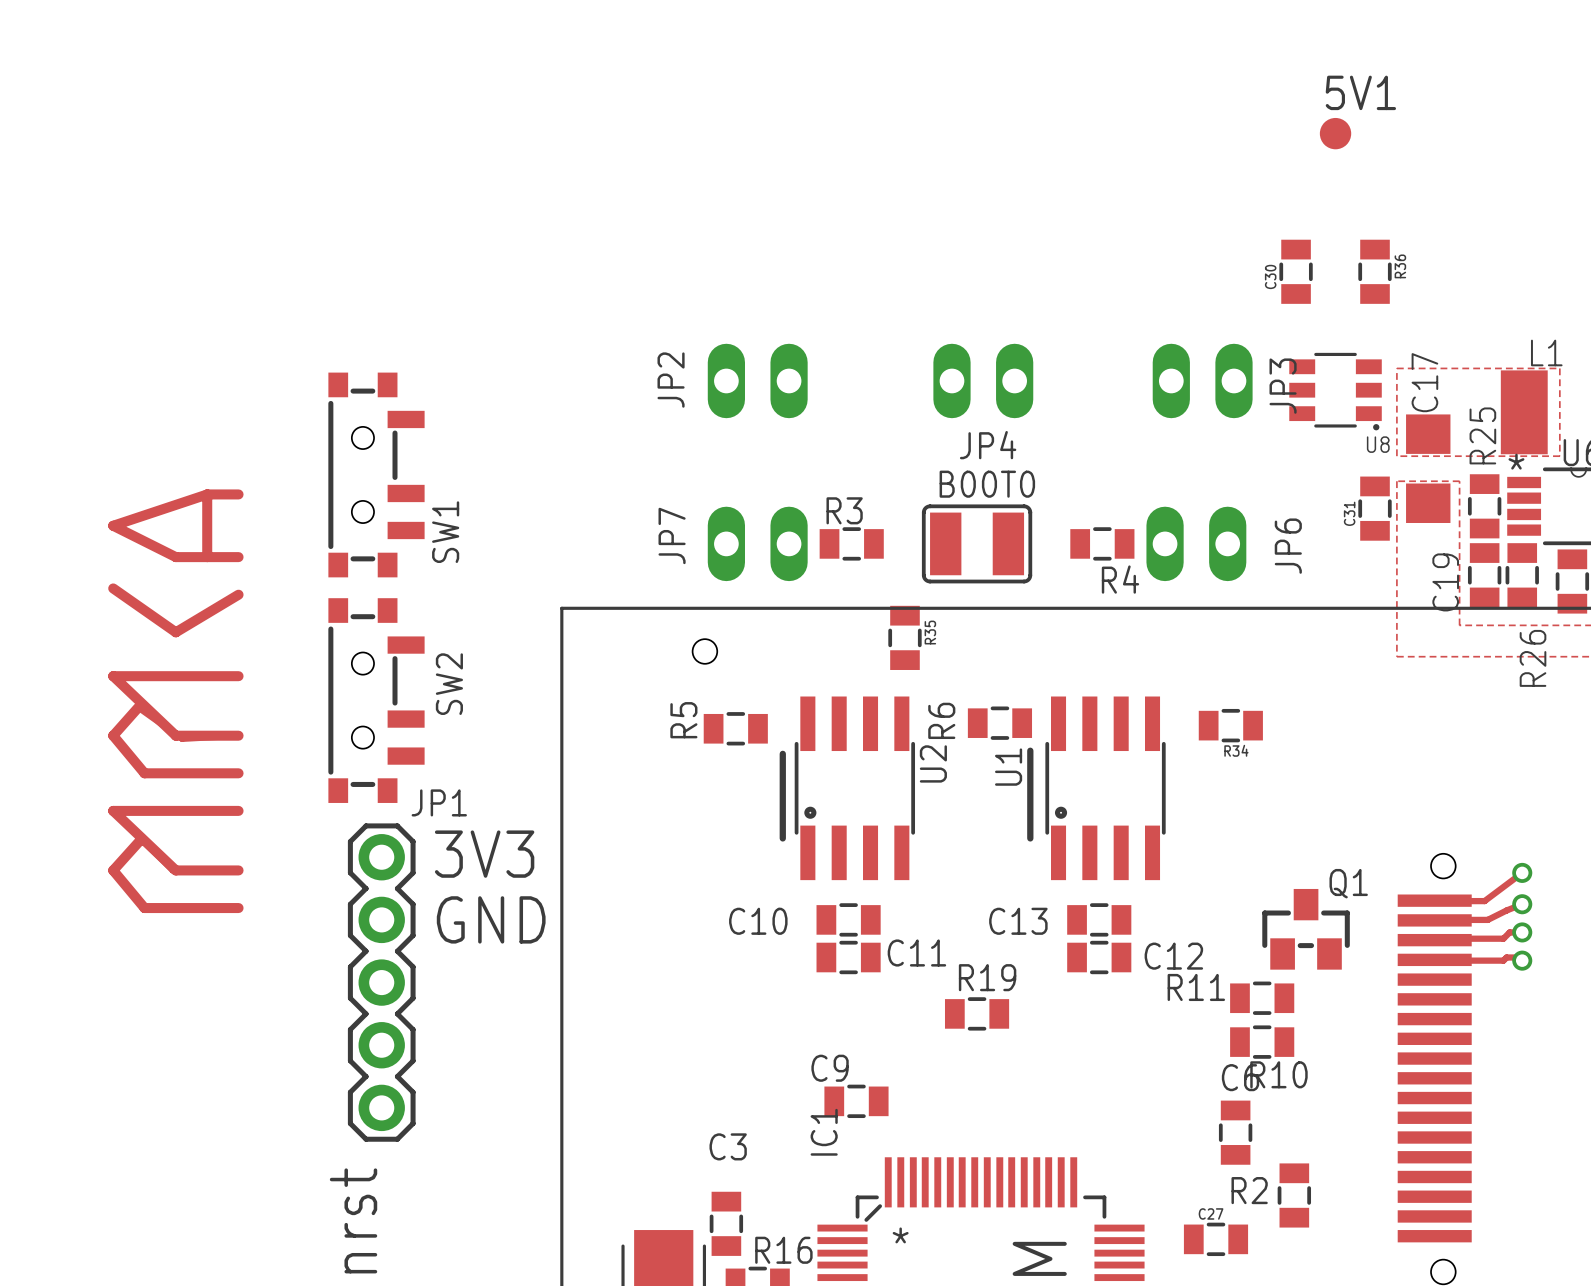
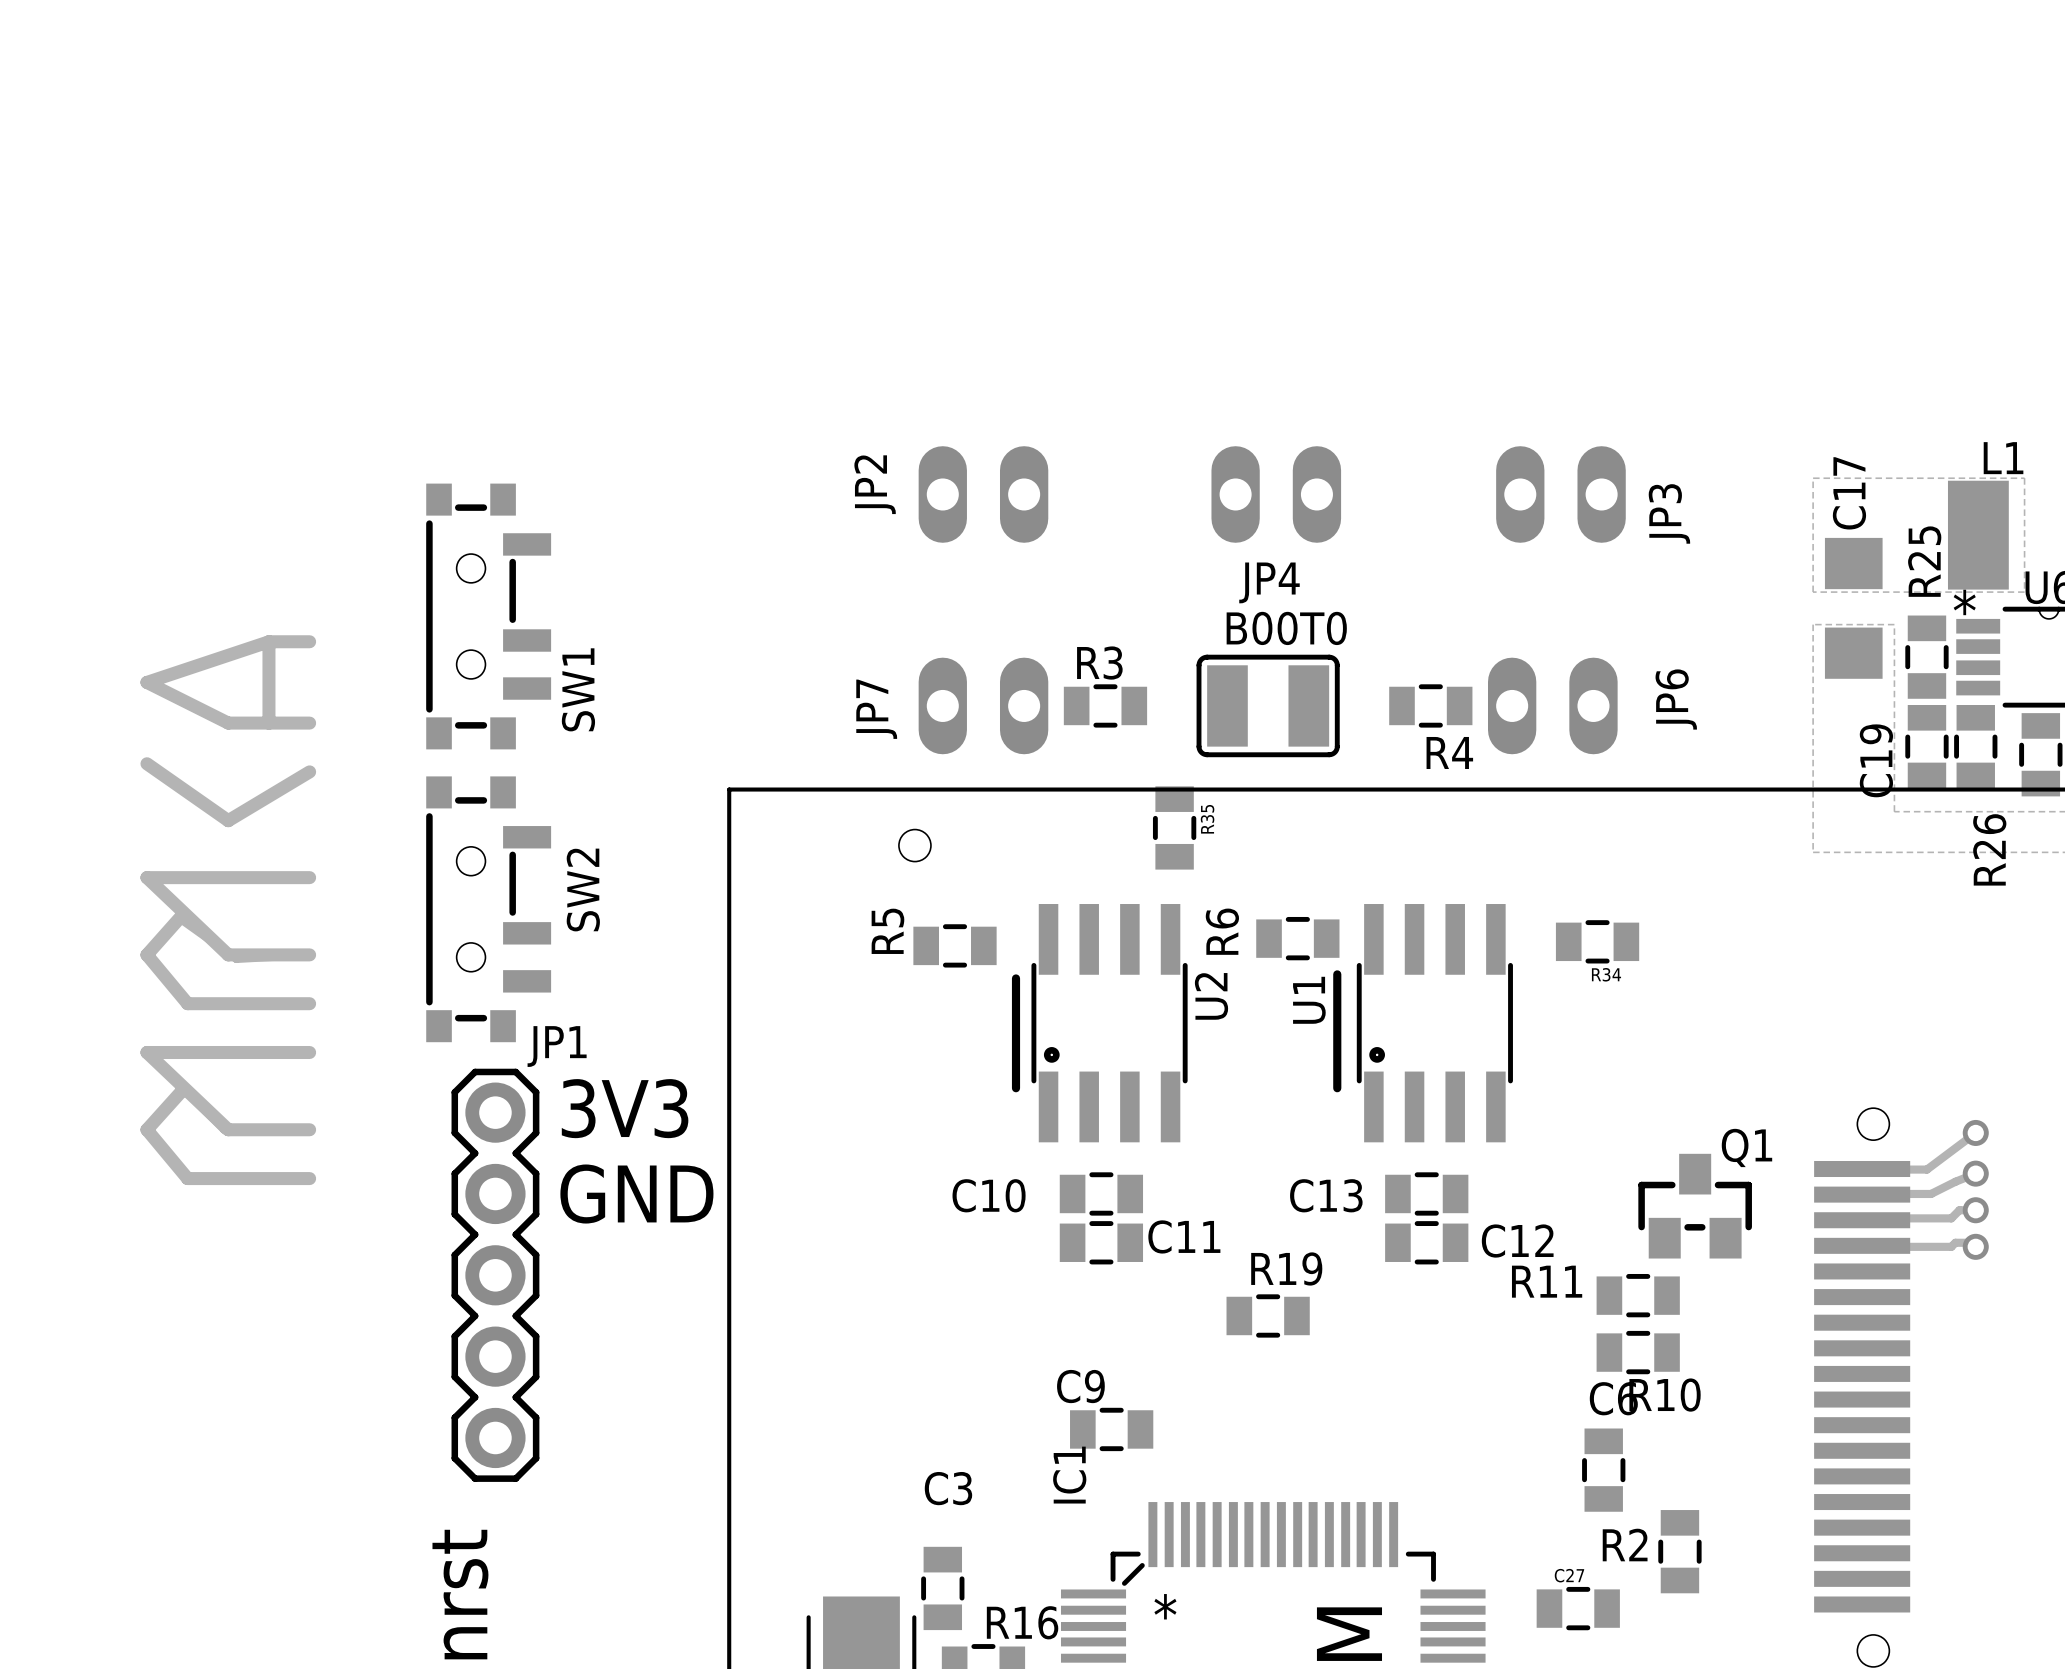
5V1: (1335, 133) -> none
C30: (1296, 271) -> none
R36: (1375, 271) -> none
U8: (1335, 391) -> none
C31: (1375, 508) -> none

